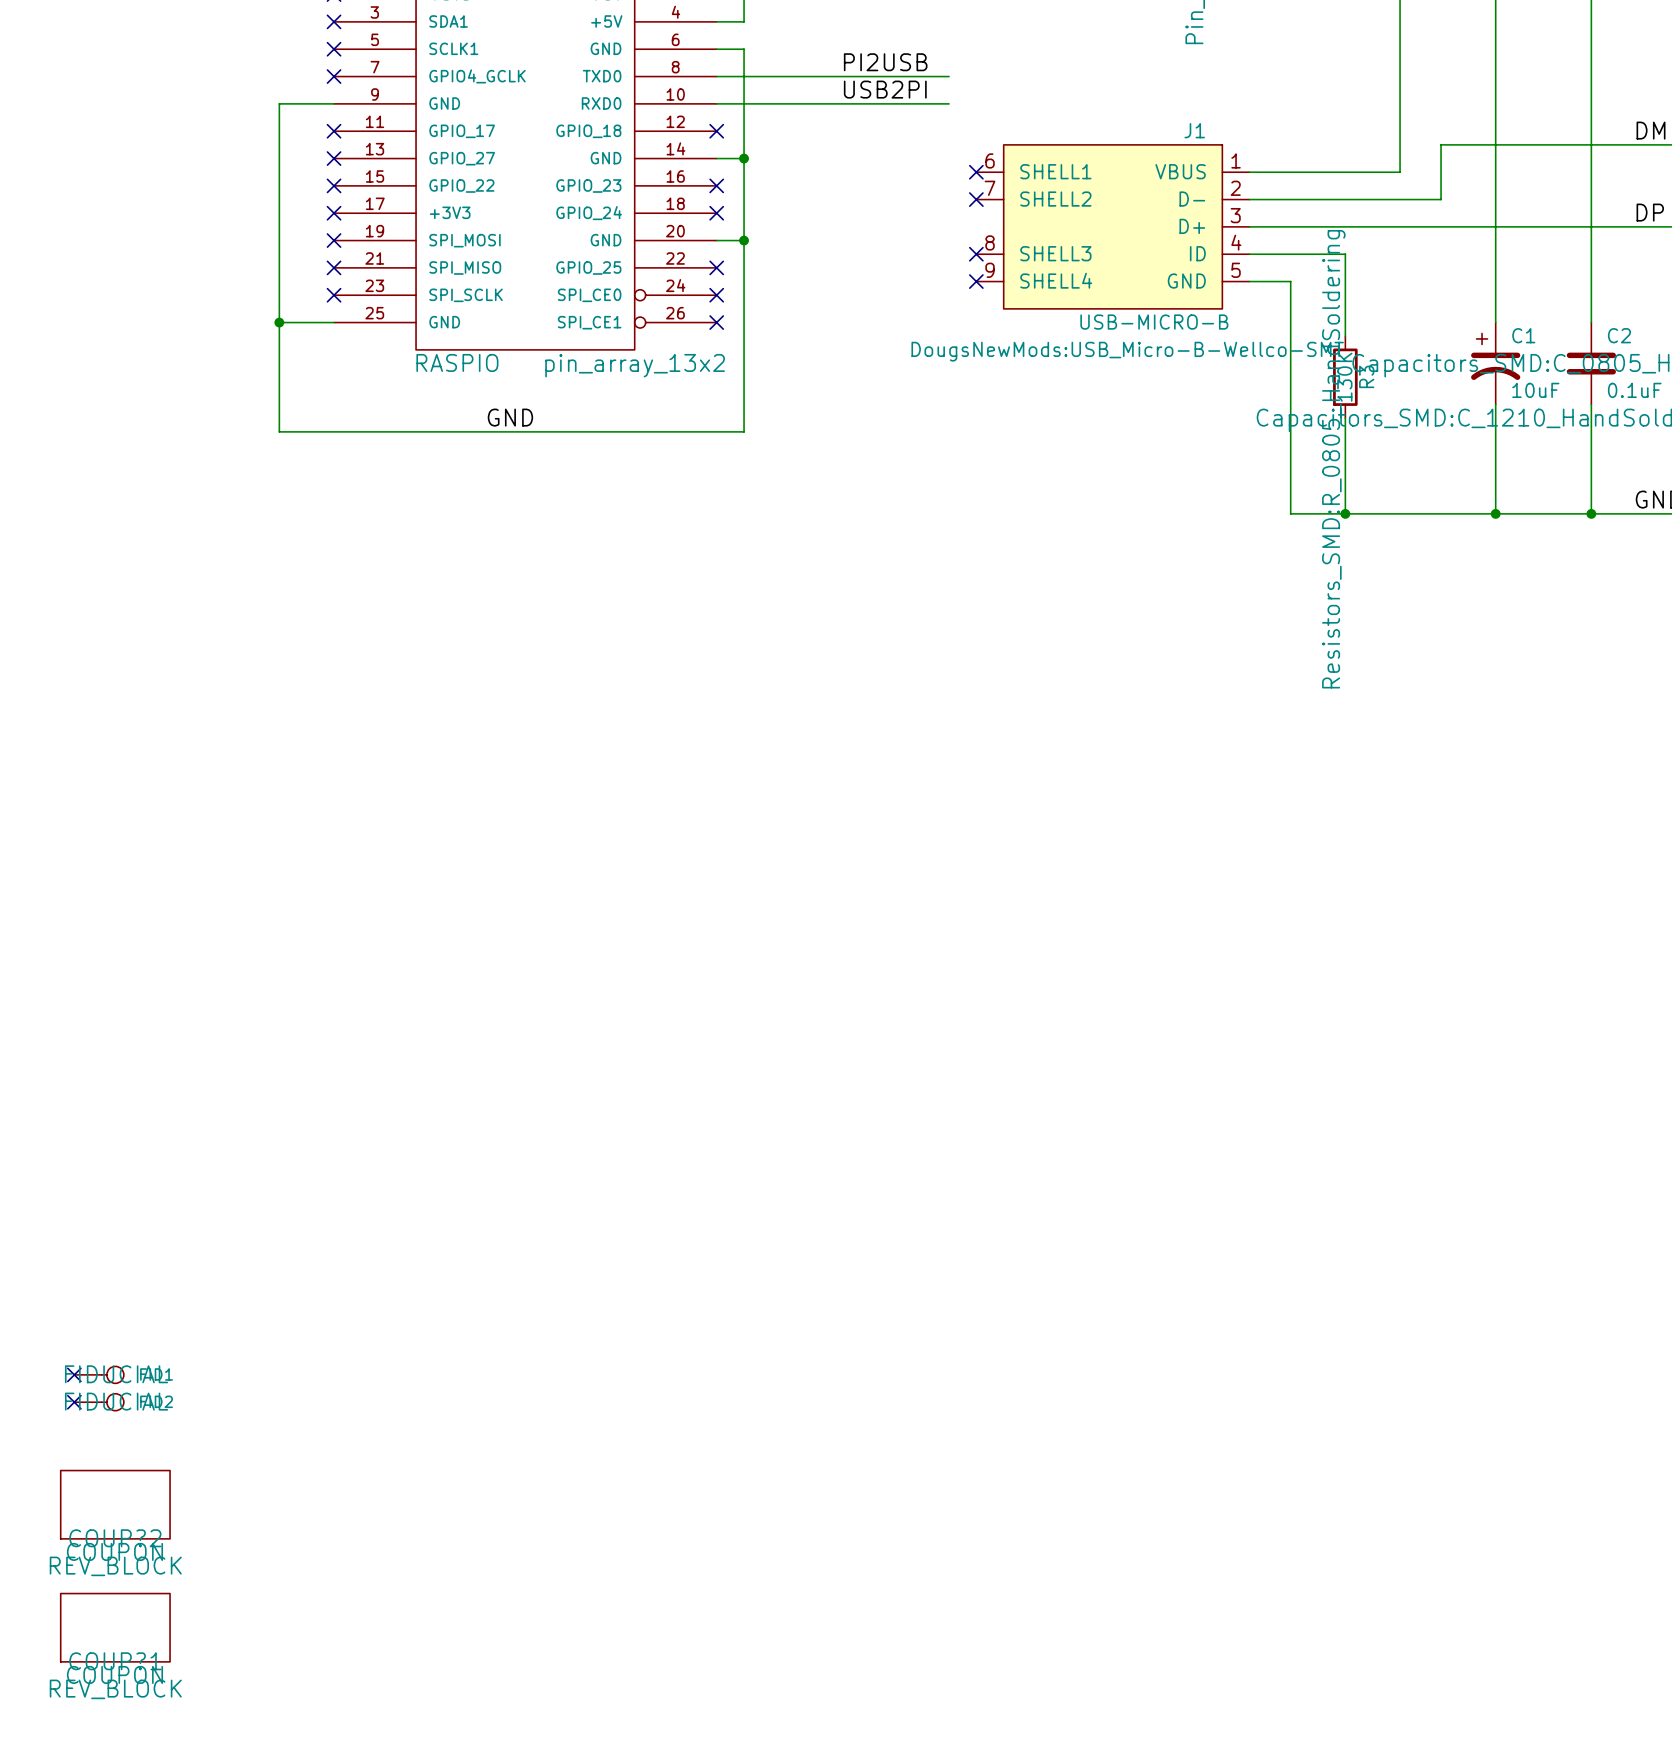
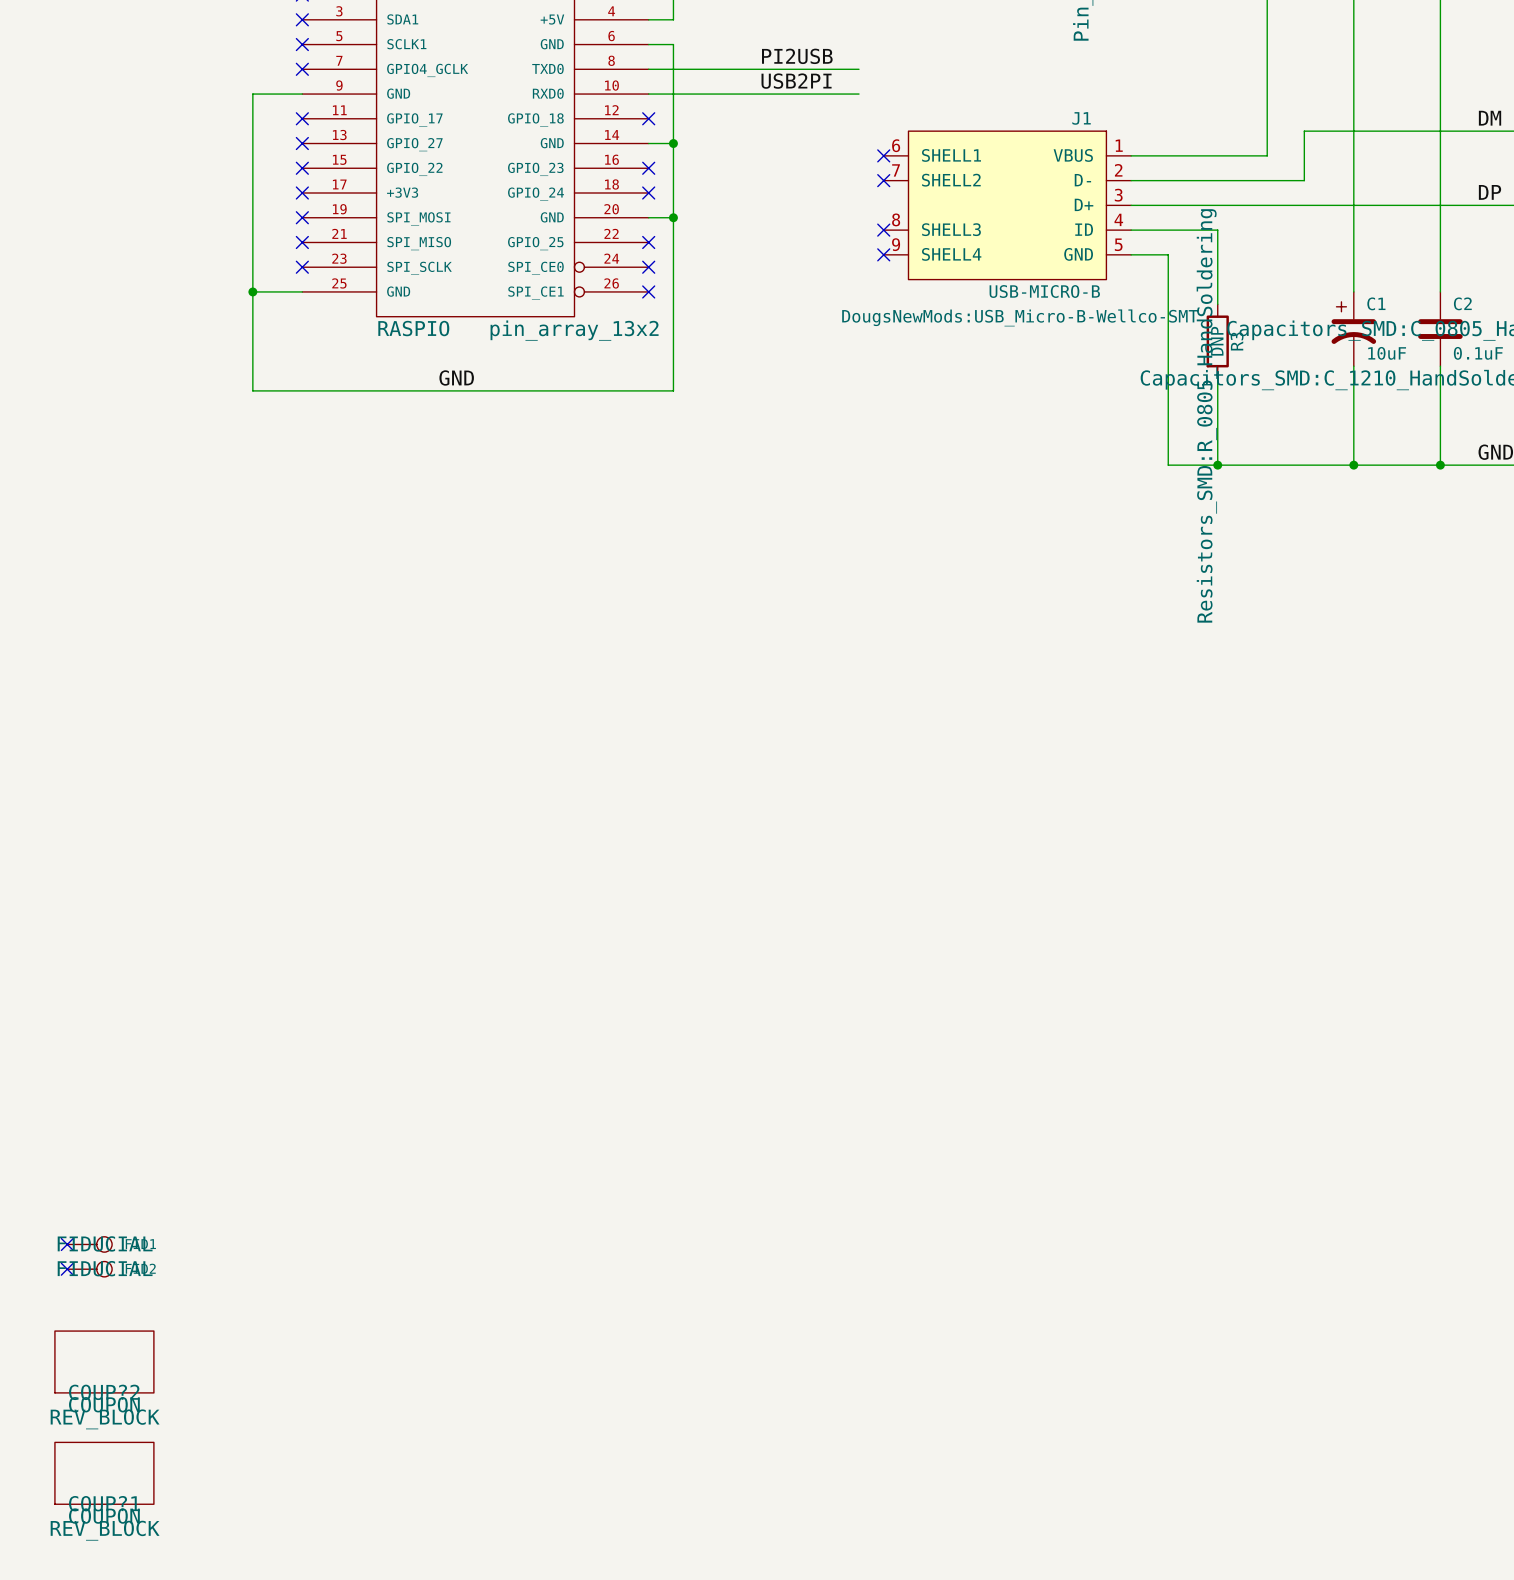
R3 value: 130K (1344, 377) -> DNP (1217, 341)

